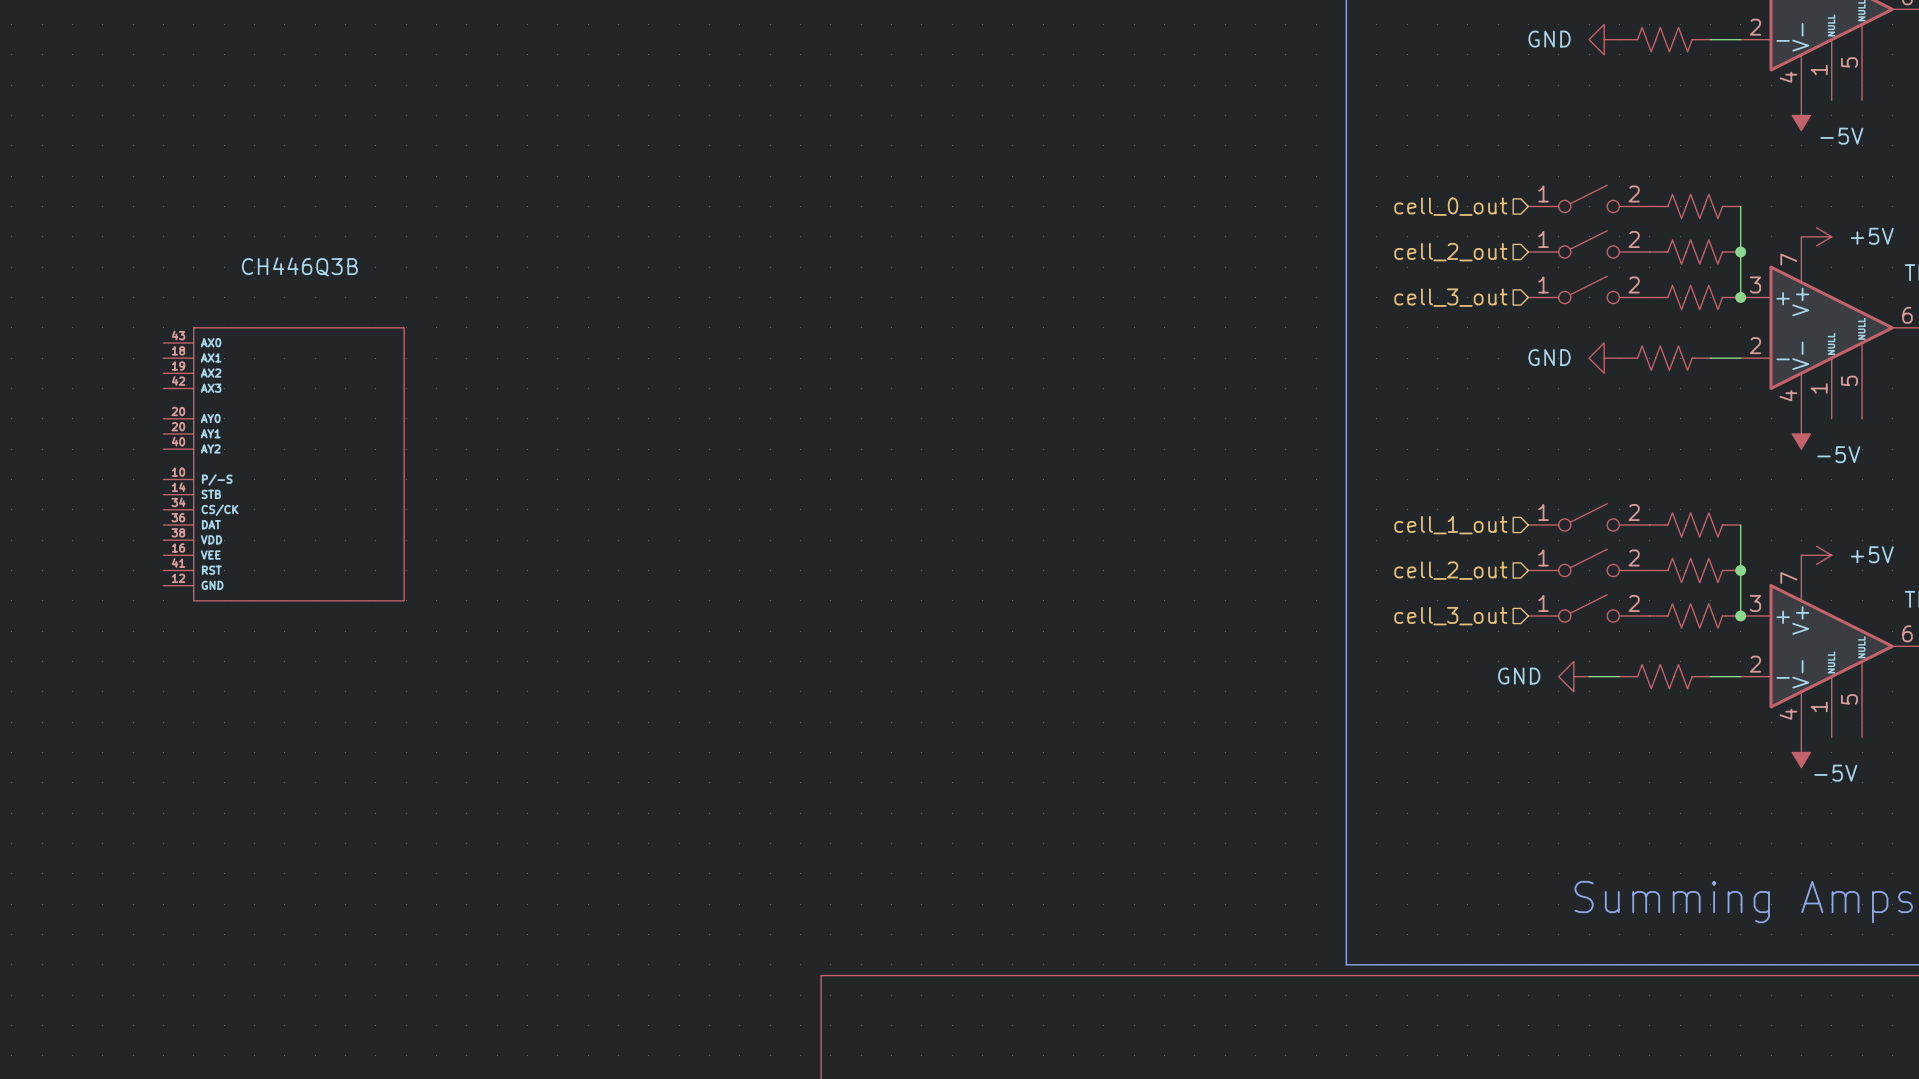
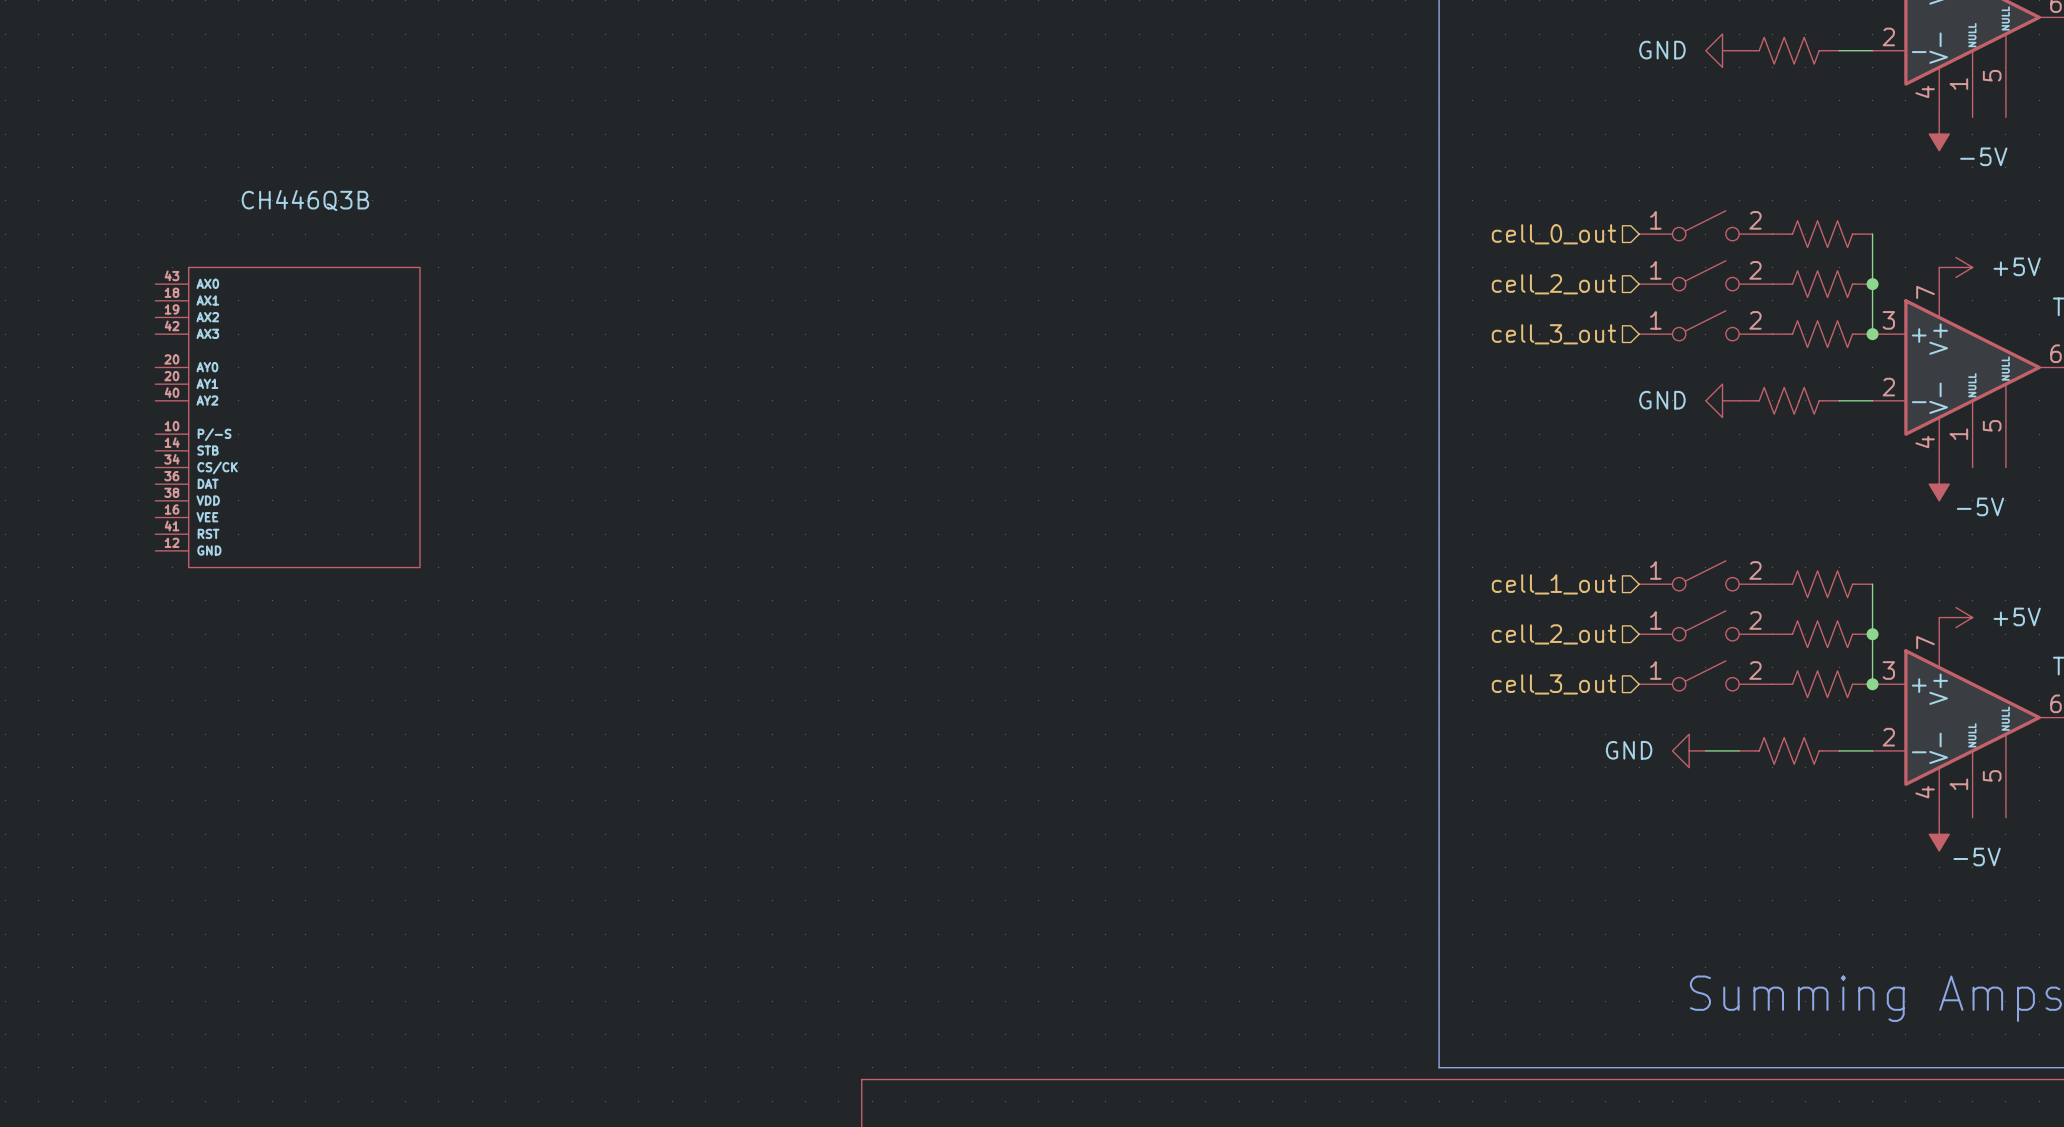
CH446Q3B position: (283, 464) -> (287, 417)

